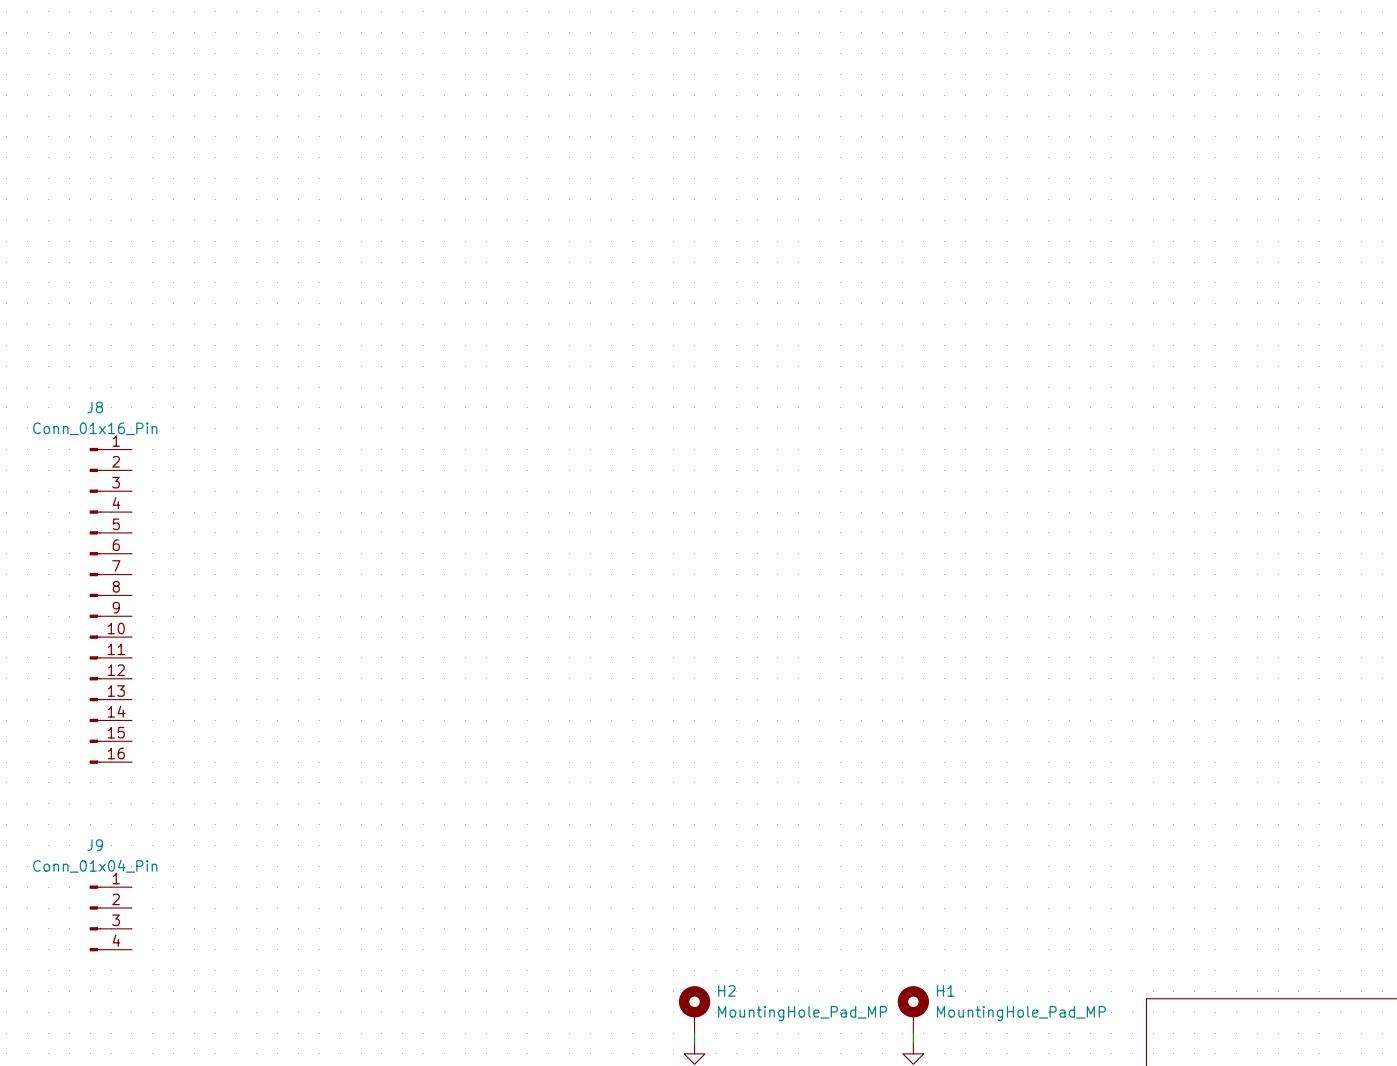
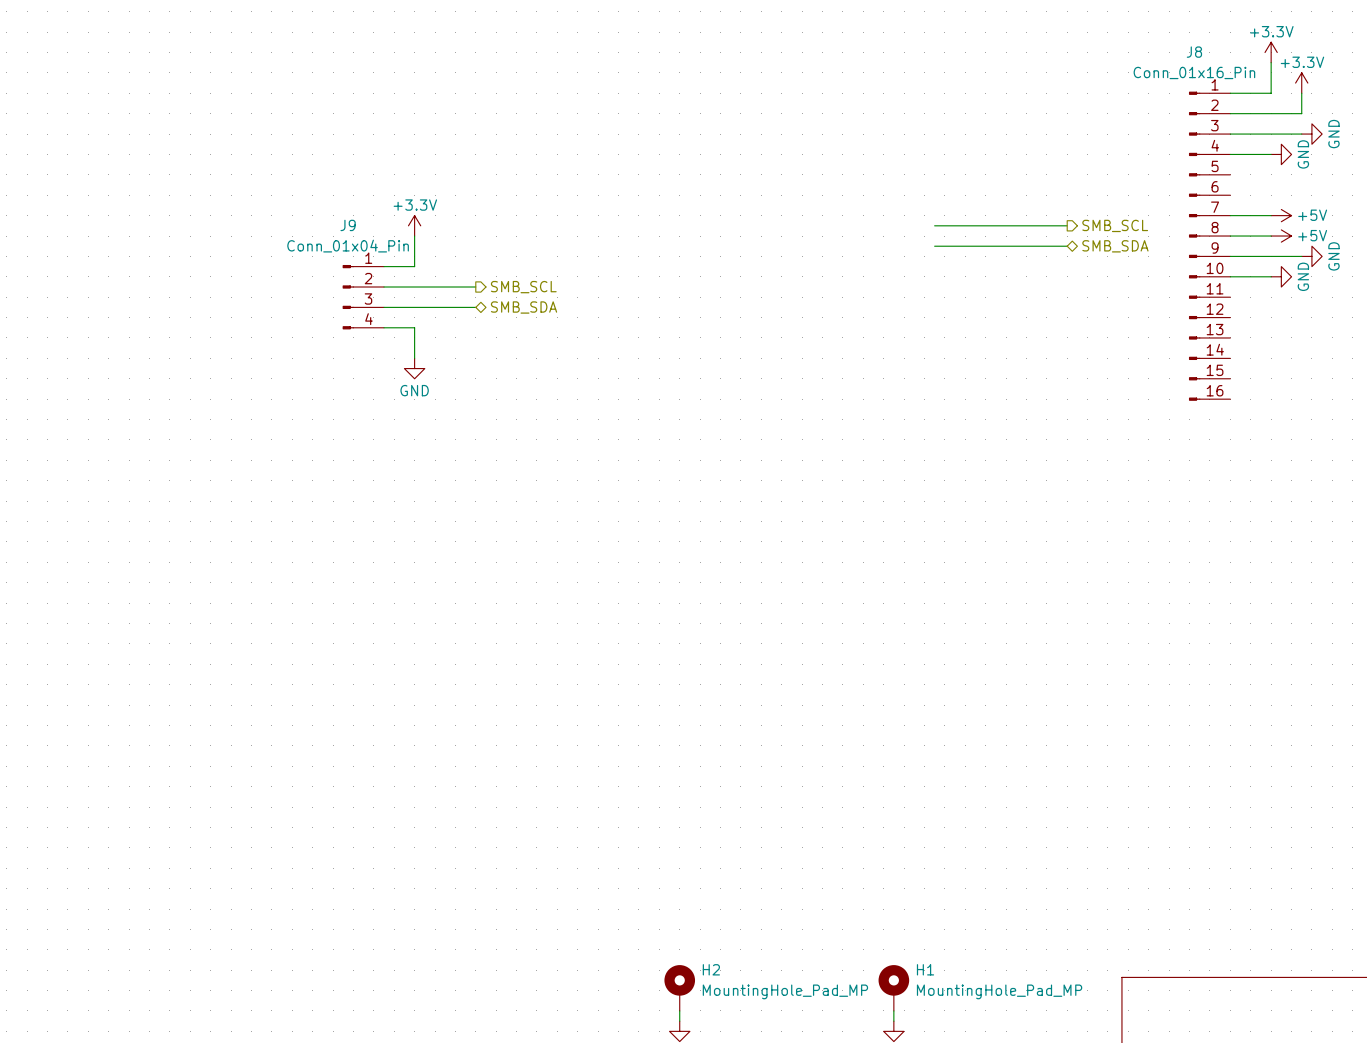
power symbol: none -> +3.3V (1271, 52)
wire: none -> (1271, 62) (1271, 93) (1230, 93)
power symbol: none -> +3.3V (1301, 83)
wire: none -> (1301, 93) (1301, 113) (1230, 113)
wire: none -> (1230, 134) (1301, 134)
power symbol: none -> GND (1311, 134)
wire: none -> (1230, 154) (1271, 154)
power symbol: none -> GND (1281, 154)
wire: none -> (1230, 215) (1271, 215)
power symbol: none -> +5V (1281, 215)
power symbol: none -> +3.3V (414, 225)
wire: none -> (934, 225) (1067, 225)
hierarchical label: none -> SMB_SCL (1115, 225)
wire: none -> (414, 236) (414, 266) (384, 266)
wire: none -> (1230, 236) (1271, 236)
power symbol: none -> +5V (1281, 236)
wire: none -> (934, 246) (1067, 246)
hierarchical label: none -> SMB_SDA (1115, 246)
wire: none -> (1230, 256) (1301, 256)
power symbol: none -> GND (1311, 256)
wire: none -> (1230, 276) (1271, 276)
power symbol: none -> GND (1281, 276)
wire: none -> (384, 287) (475, 287)
hierarchical label: none -> SMB_SCL (523, 287)
wire: none -> (384, 307) (475, 307)
hierarchical label: none -> SMB_SDA (524, 307)
wire: none -> (384, 327) (414, 327) (414, 358)
power symbol: none -> GND (414, 368)
J8 position: (110, 605) -> (1209, 246)
J9 position: (110, 918) -> (363, 297)

